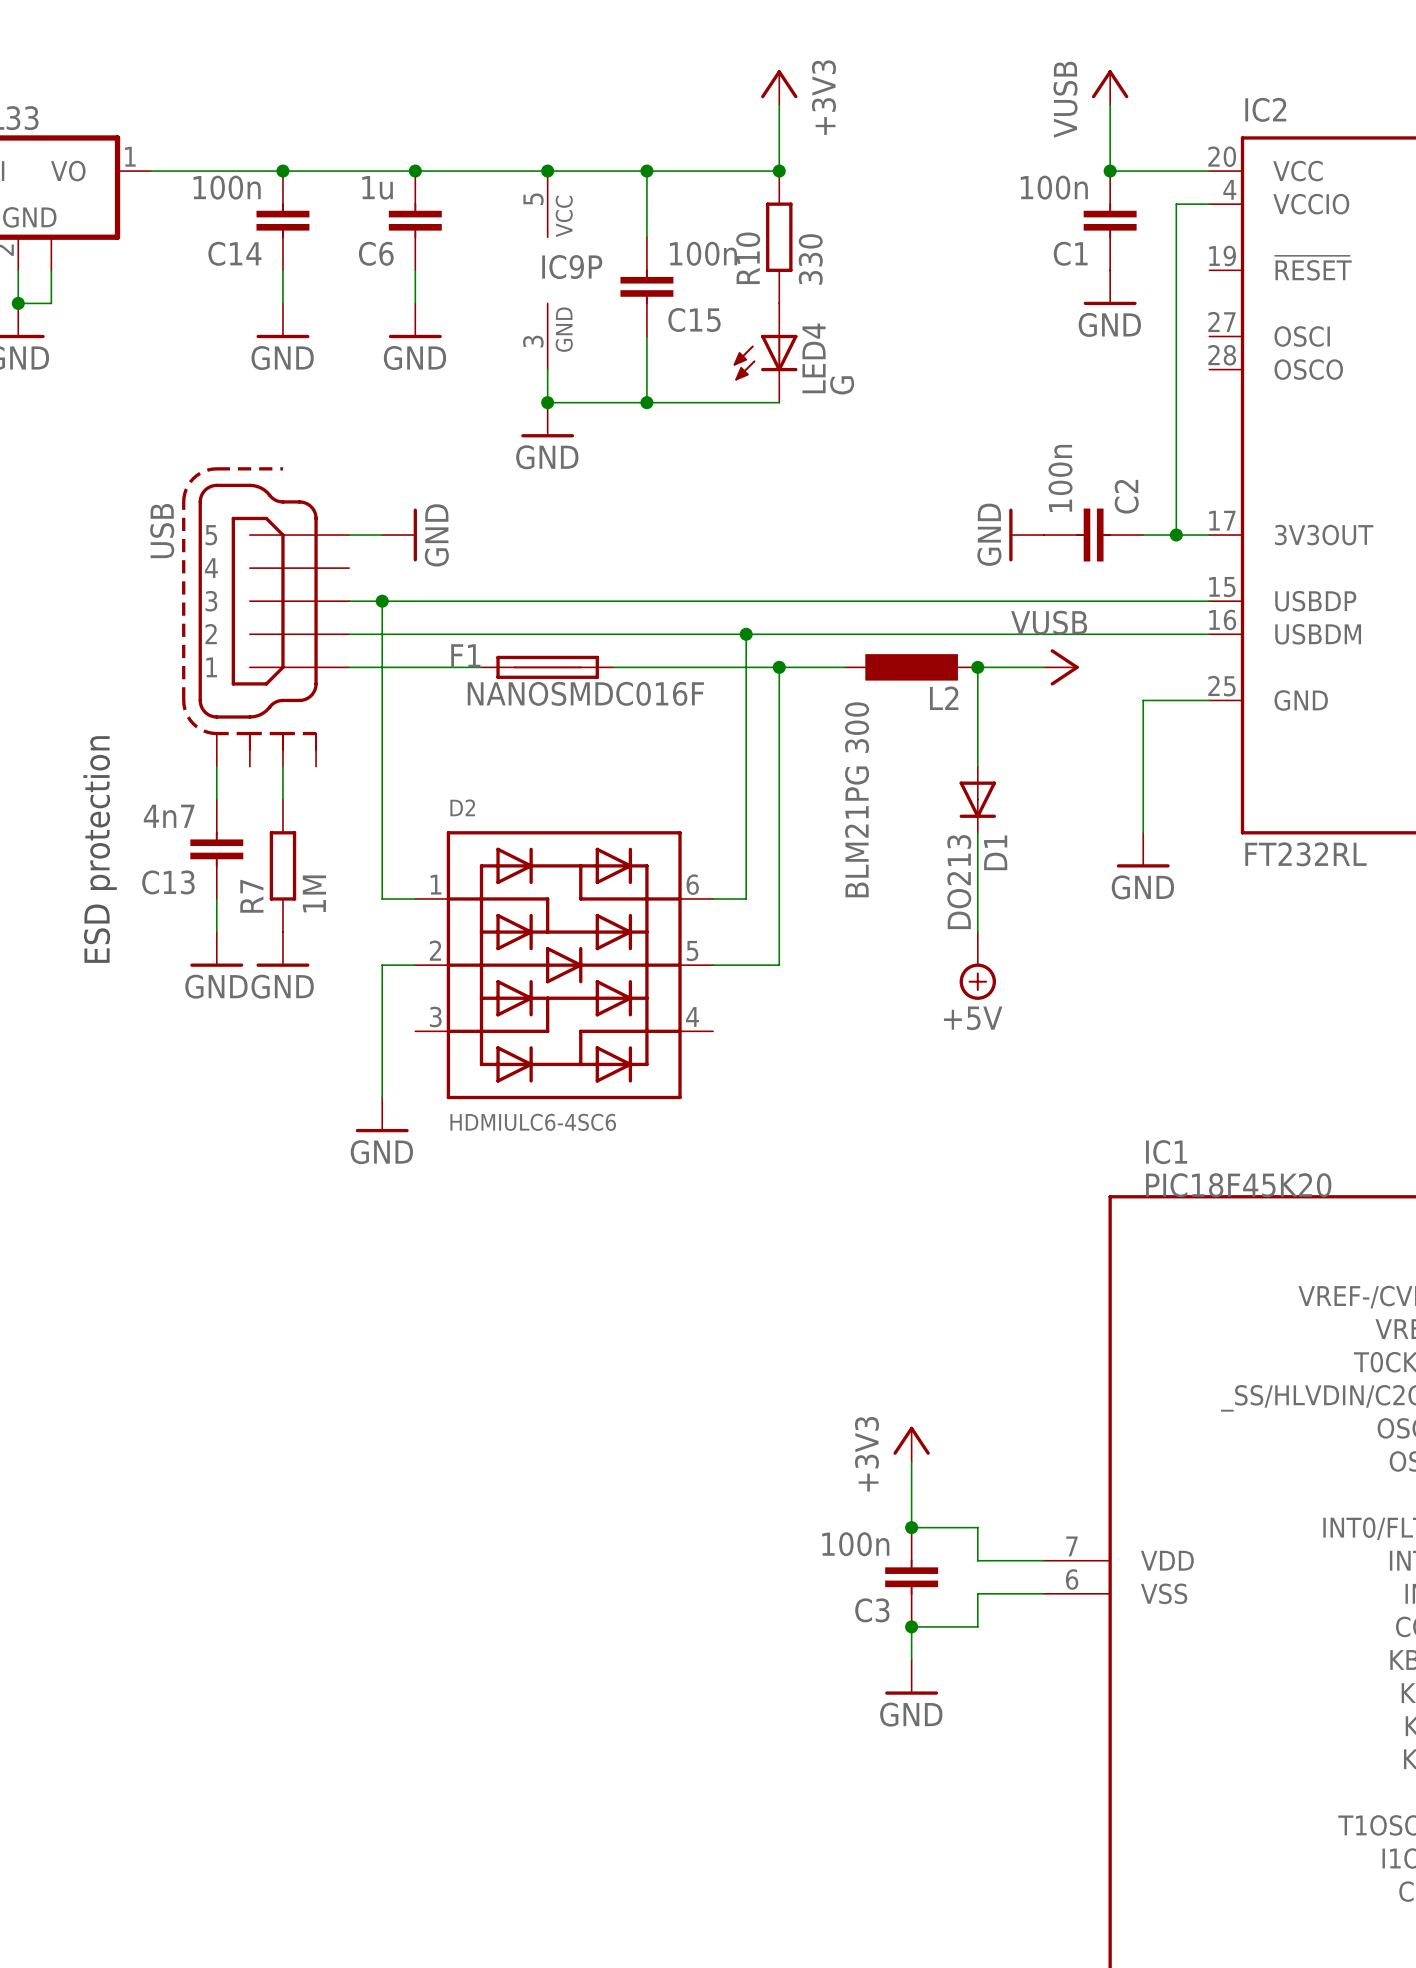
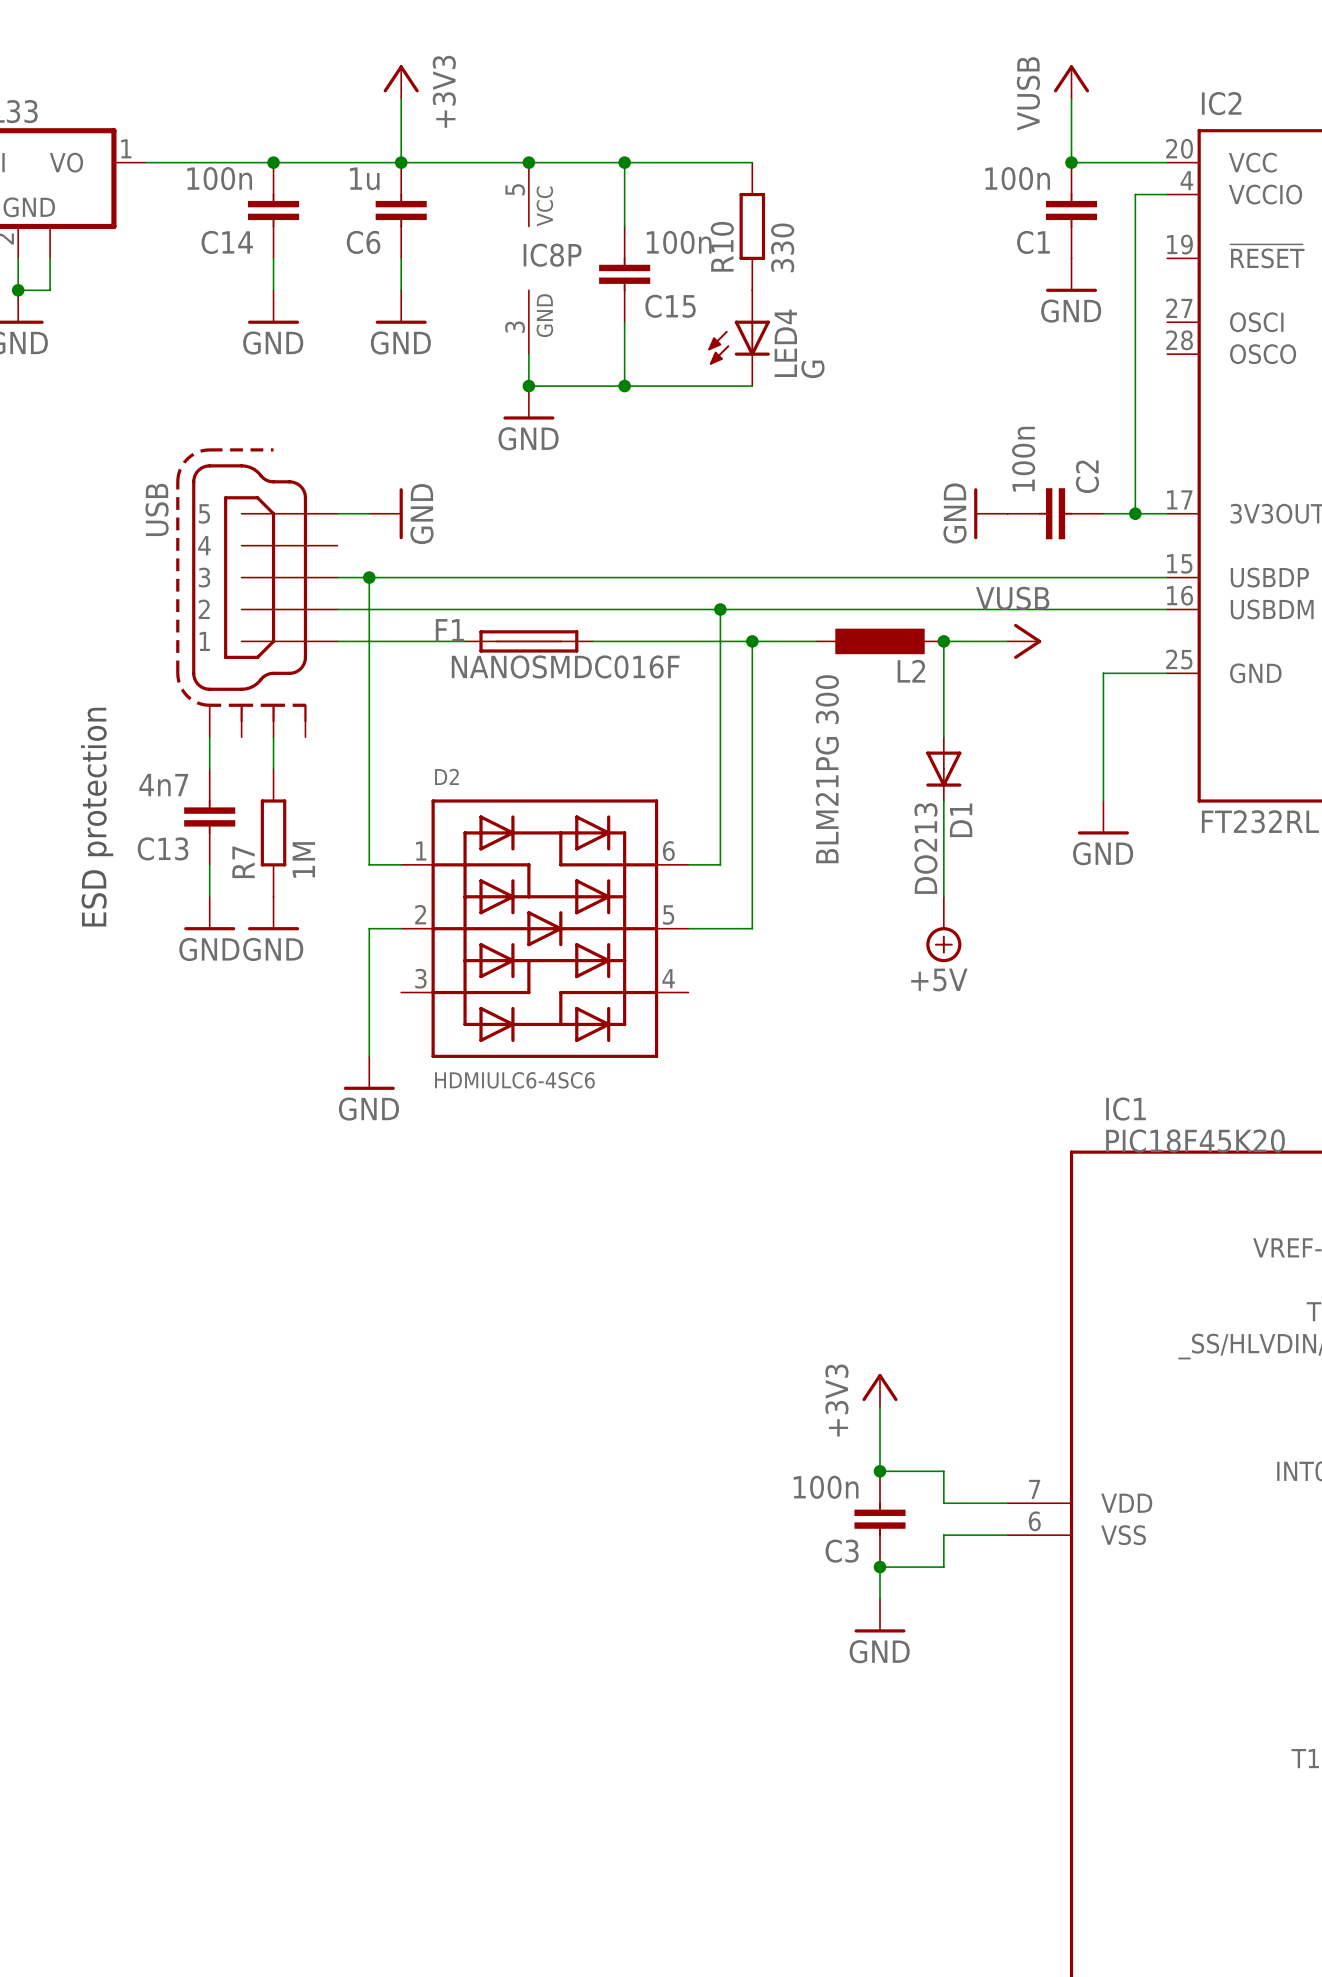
power symbol: none -> +3V3 (401, 82)
power symbol: +3V3 (779, 87) -> none
wire: none -> (401, 98) (401, 162)
wire: (779, 104) (779, 171) -> none
junction: (779, 171) -> none
IC9P name: IC9P (572, 267) -> IC8P (552, 255)

